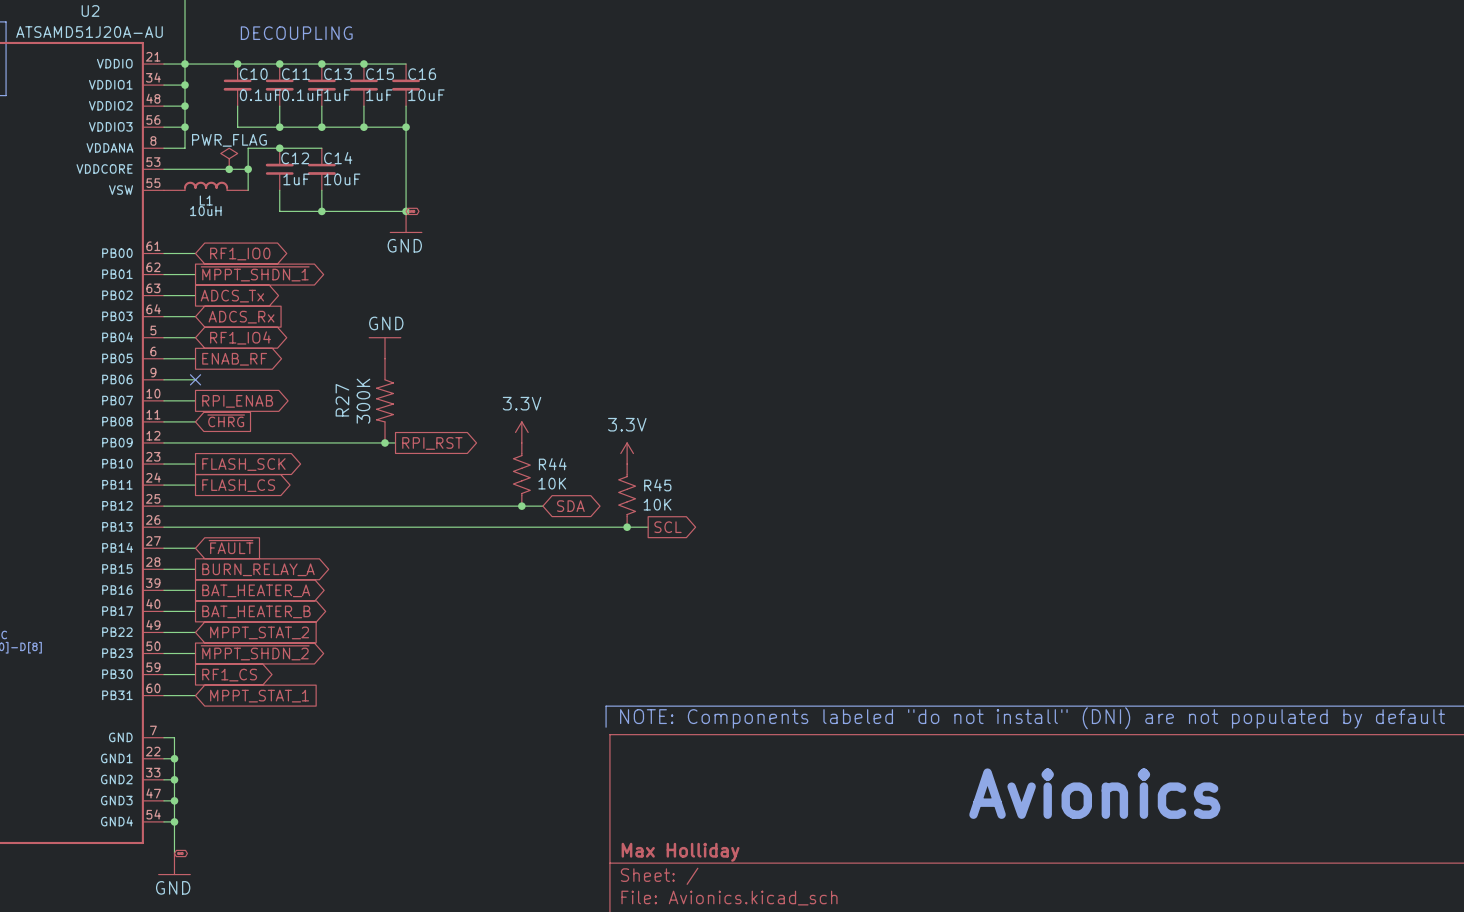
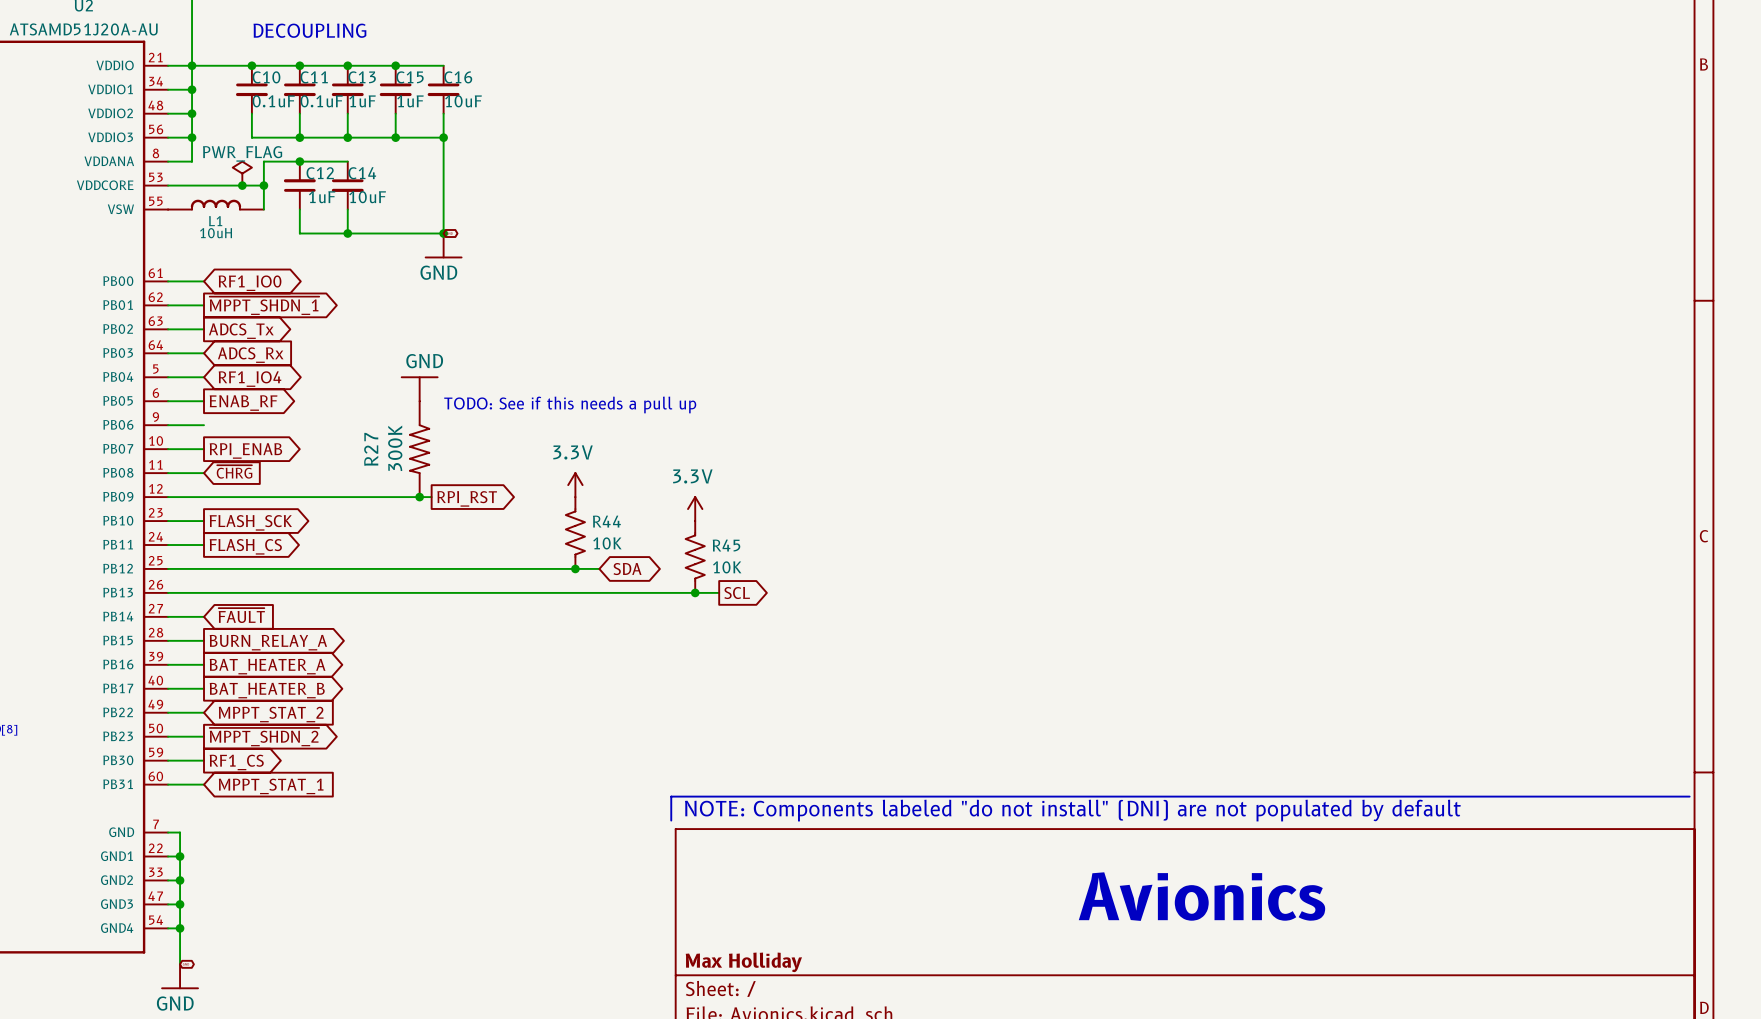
text: none -> TODO: See if this needs a pull up (570, 404)
no-connect mark: (195, 379) -> none

